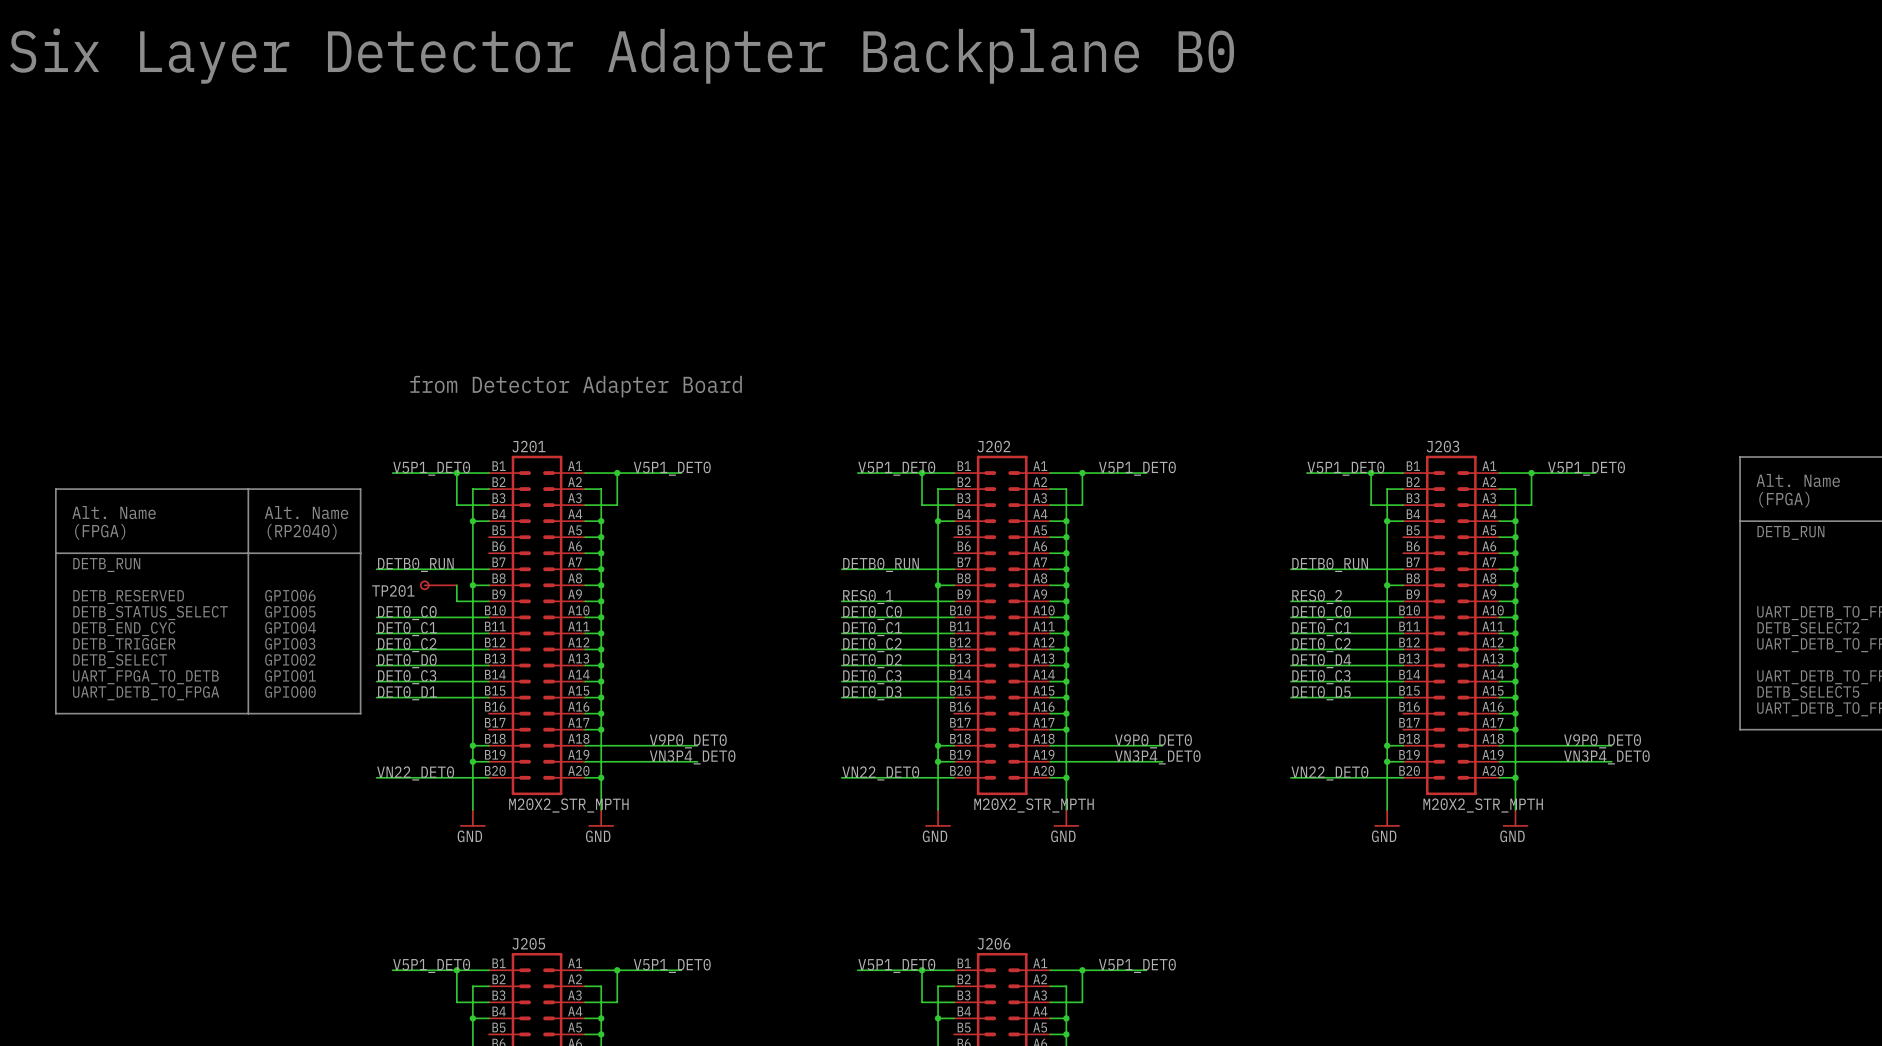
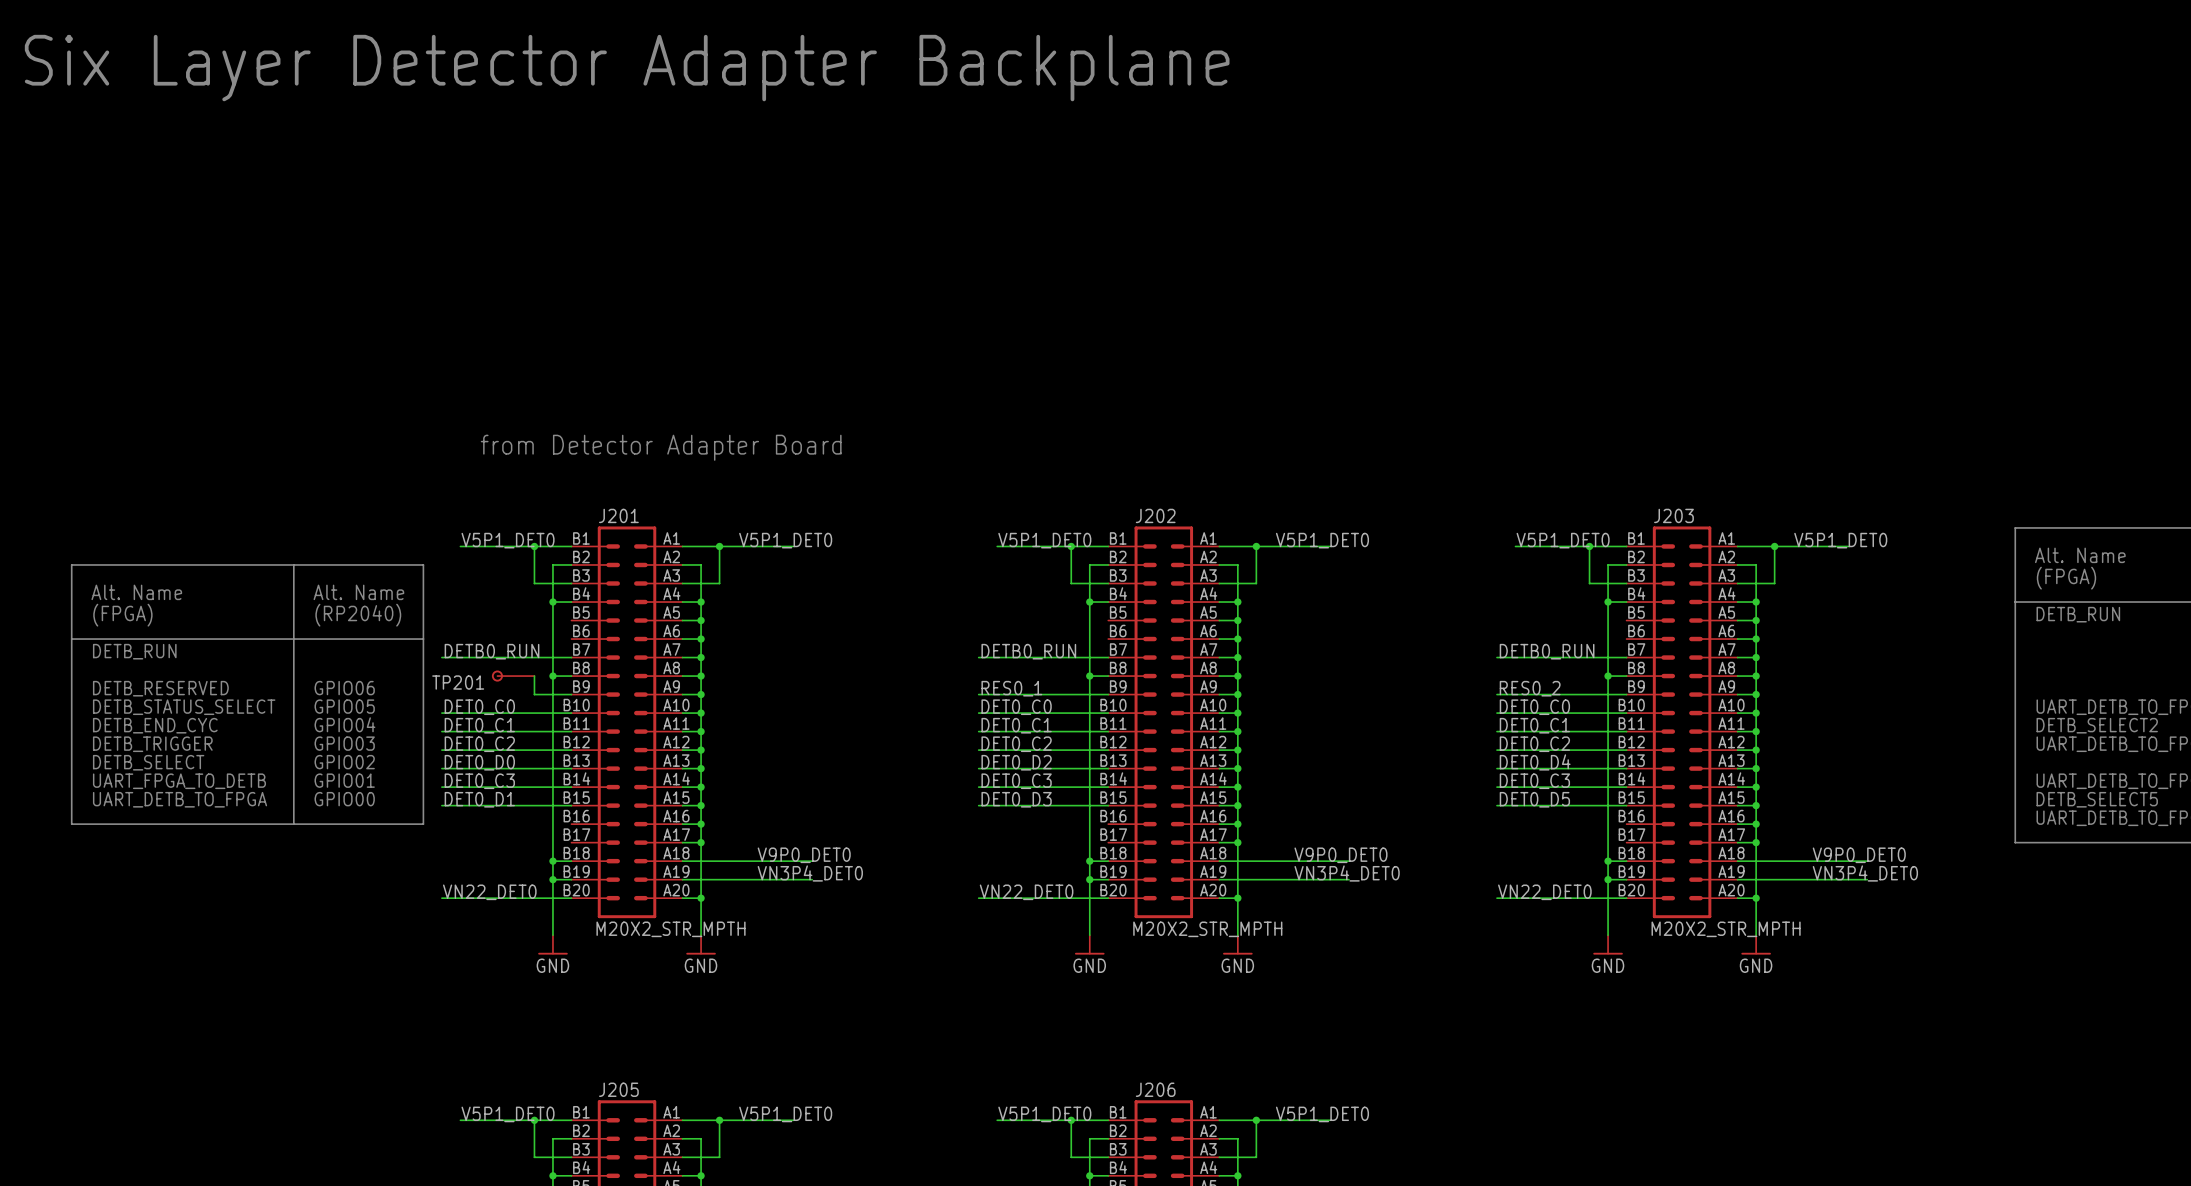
text: Six Layer Detector Adapter Backplane B0 (622, 56) -> Six Layer Detector Adapter Backplane (627, 68)

